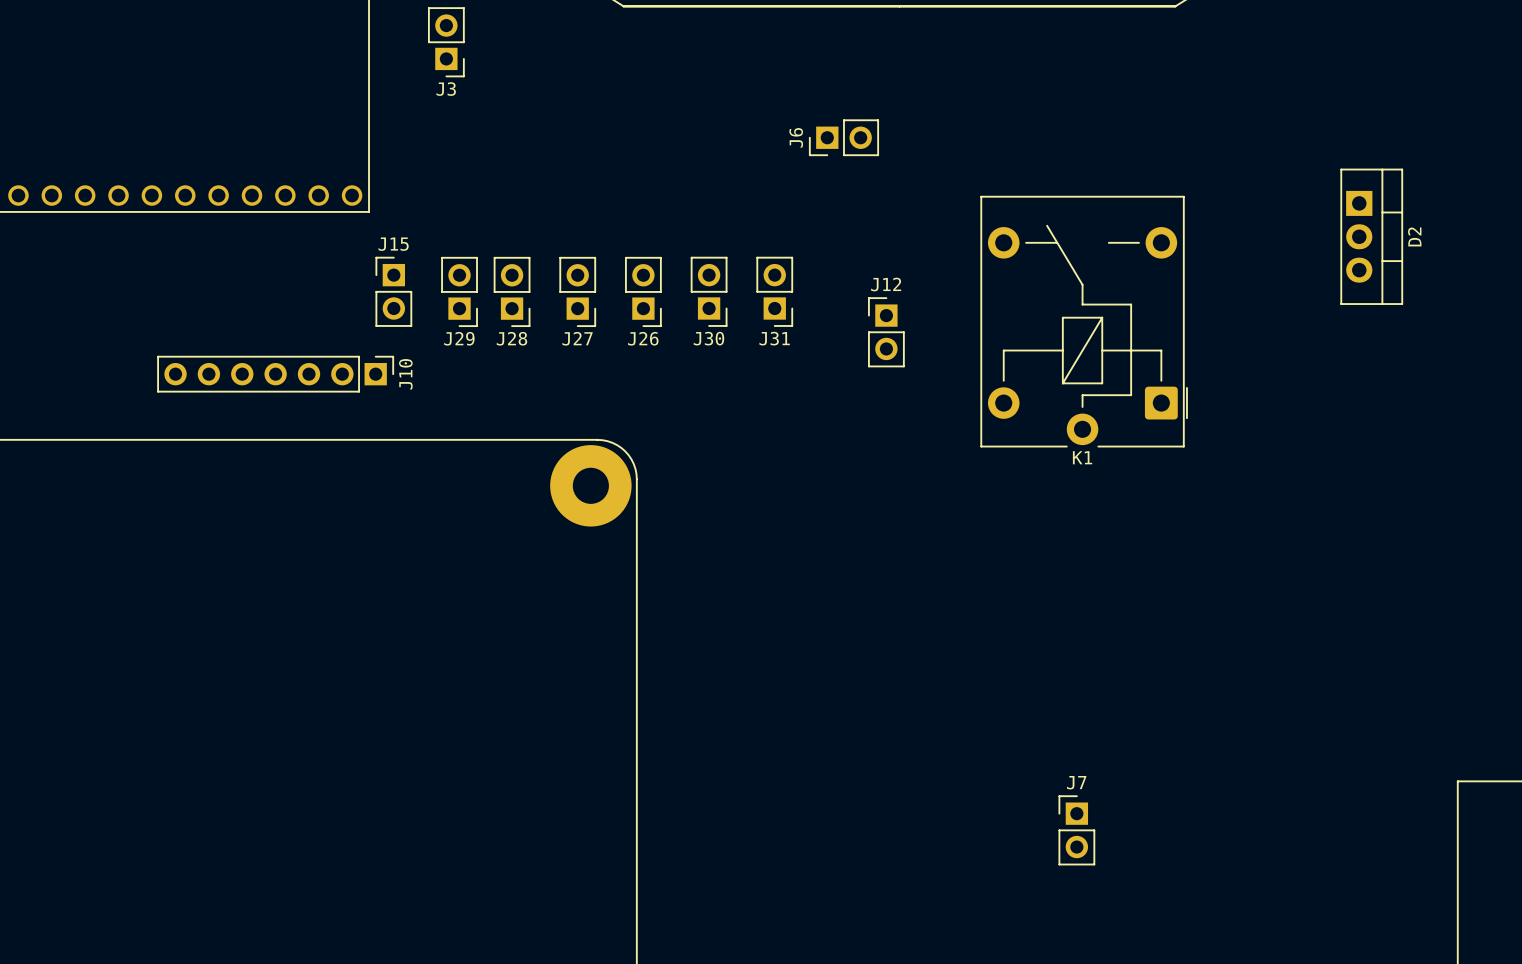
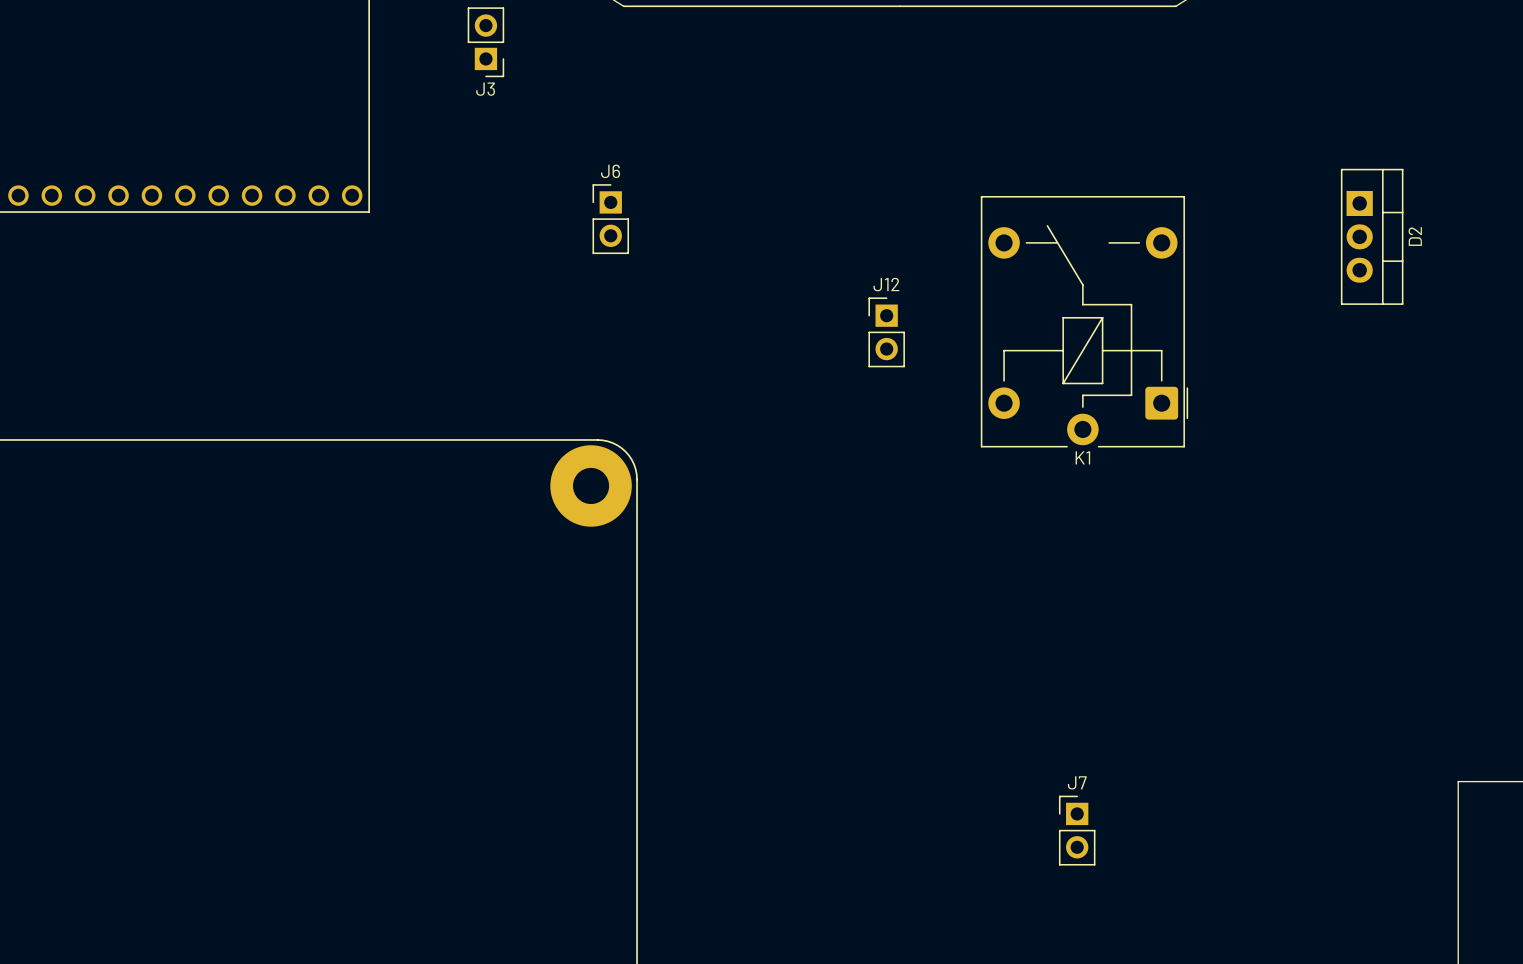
J3 position: (446, 42) -> (485, 42)
J6 rotation: 0° (843, 137) -> 90° clockwise (610, 219)
J6 position: (843, 137) -> (610, 219)
J15: (393, 291) -> none
J29: (459, 291) -> none
J28: (512, 291) -> none
J27: (577, 291) -> none
J26: (643, 291) -> none
J30: (709, 291) -> none
J31: (774, 291) -> none
J10: (275, 374) -> none

